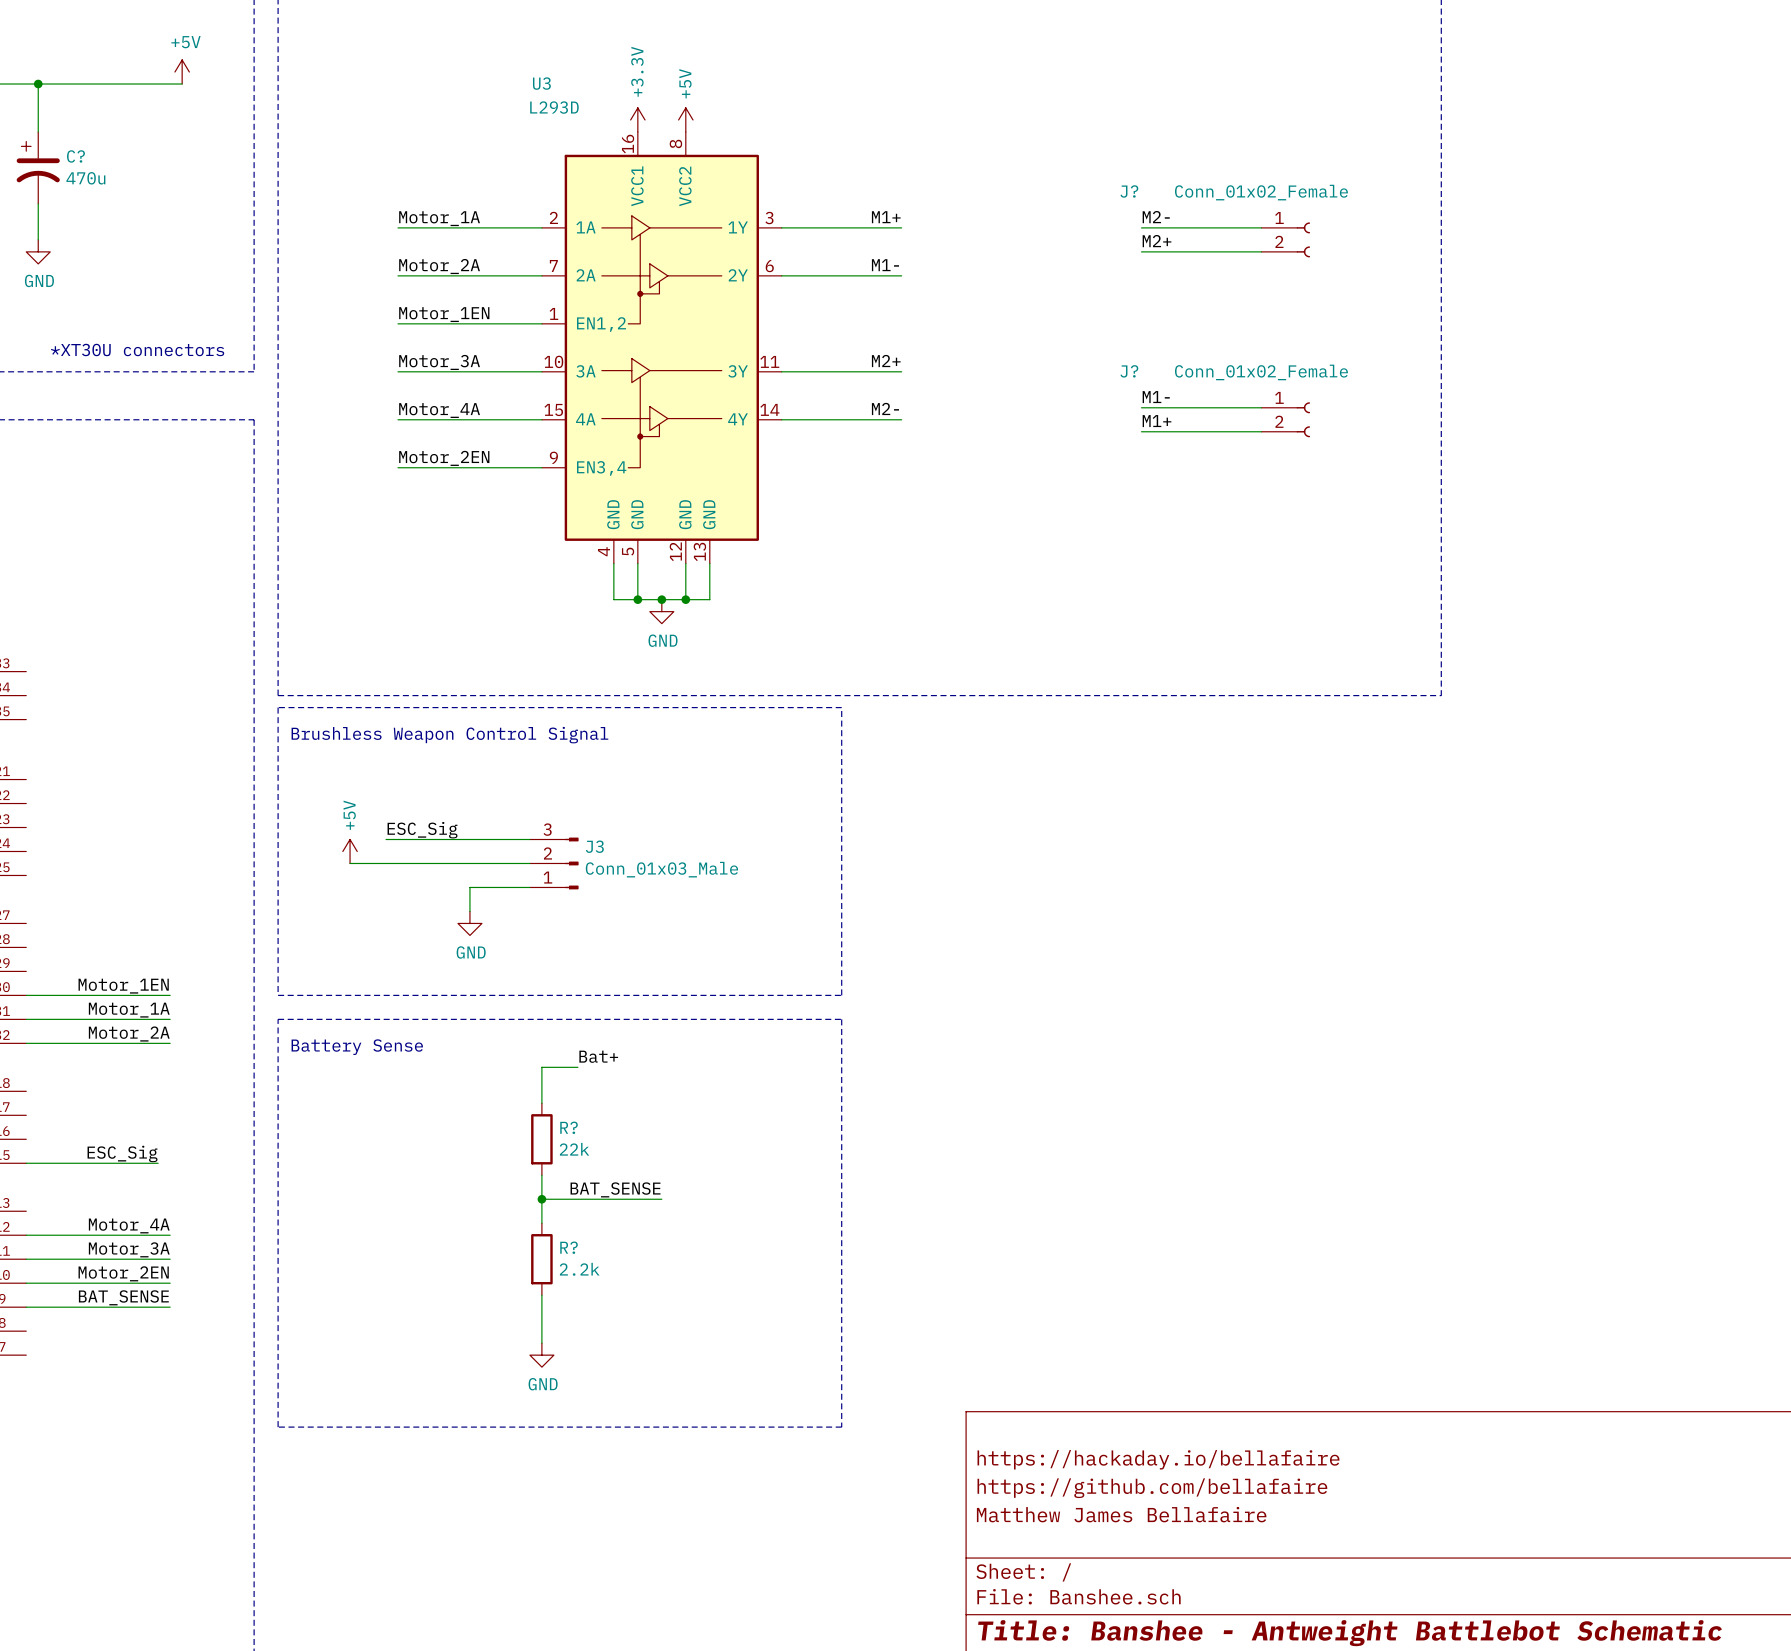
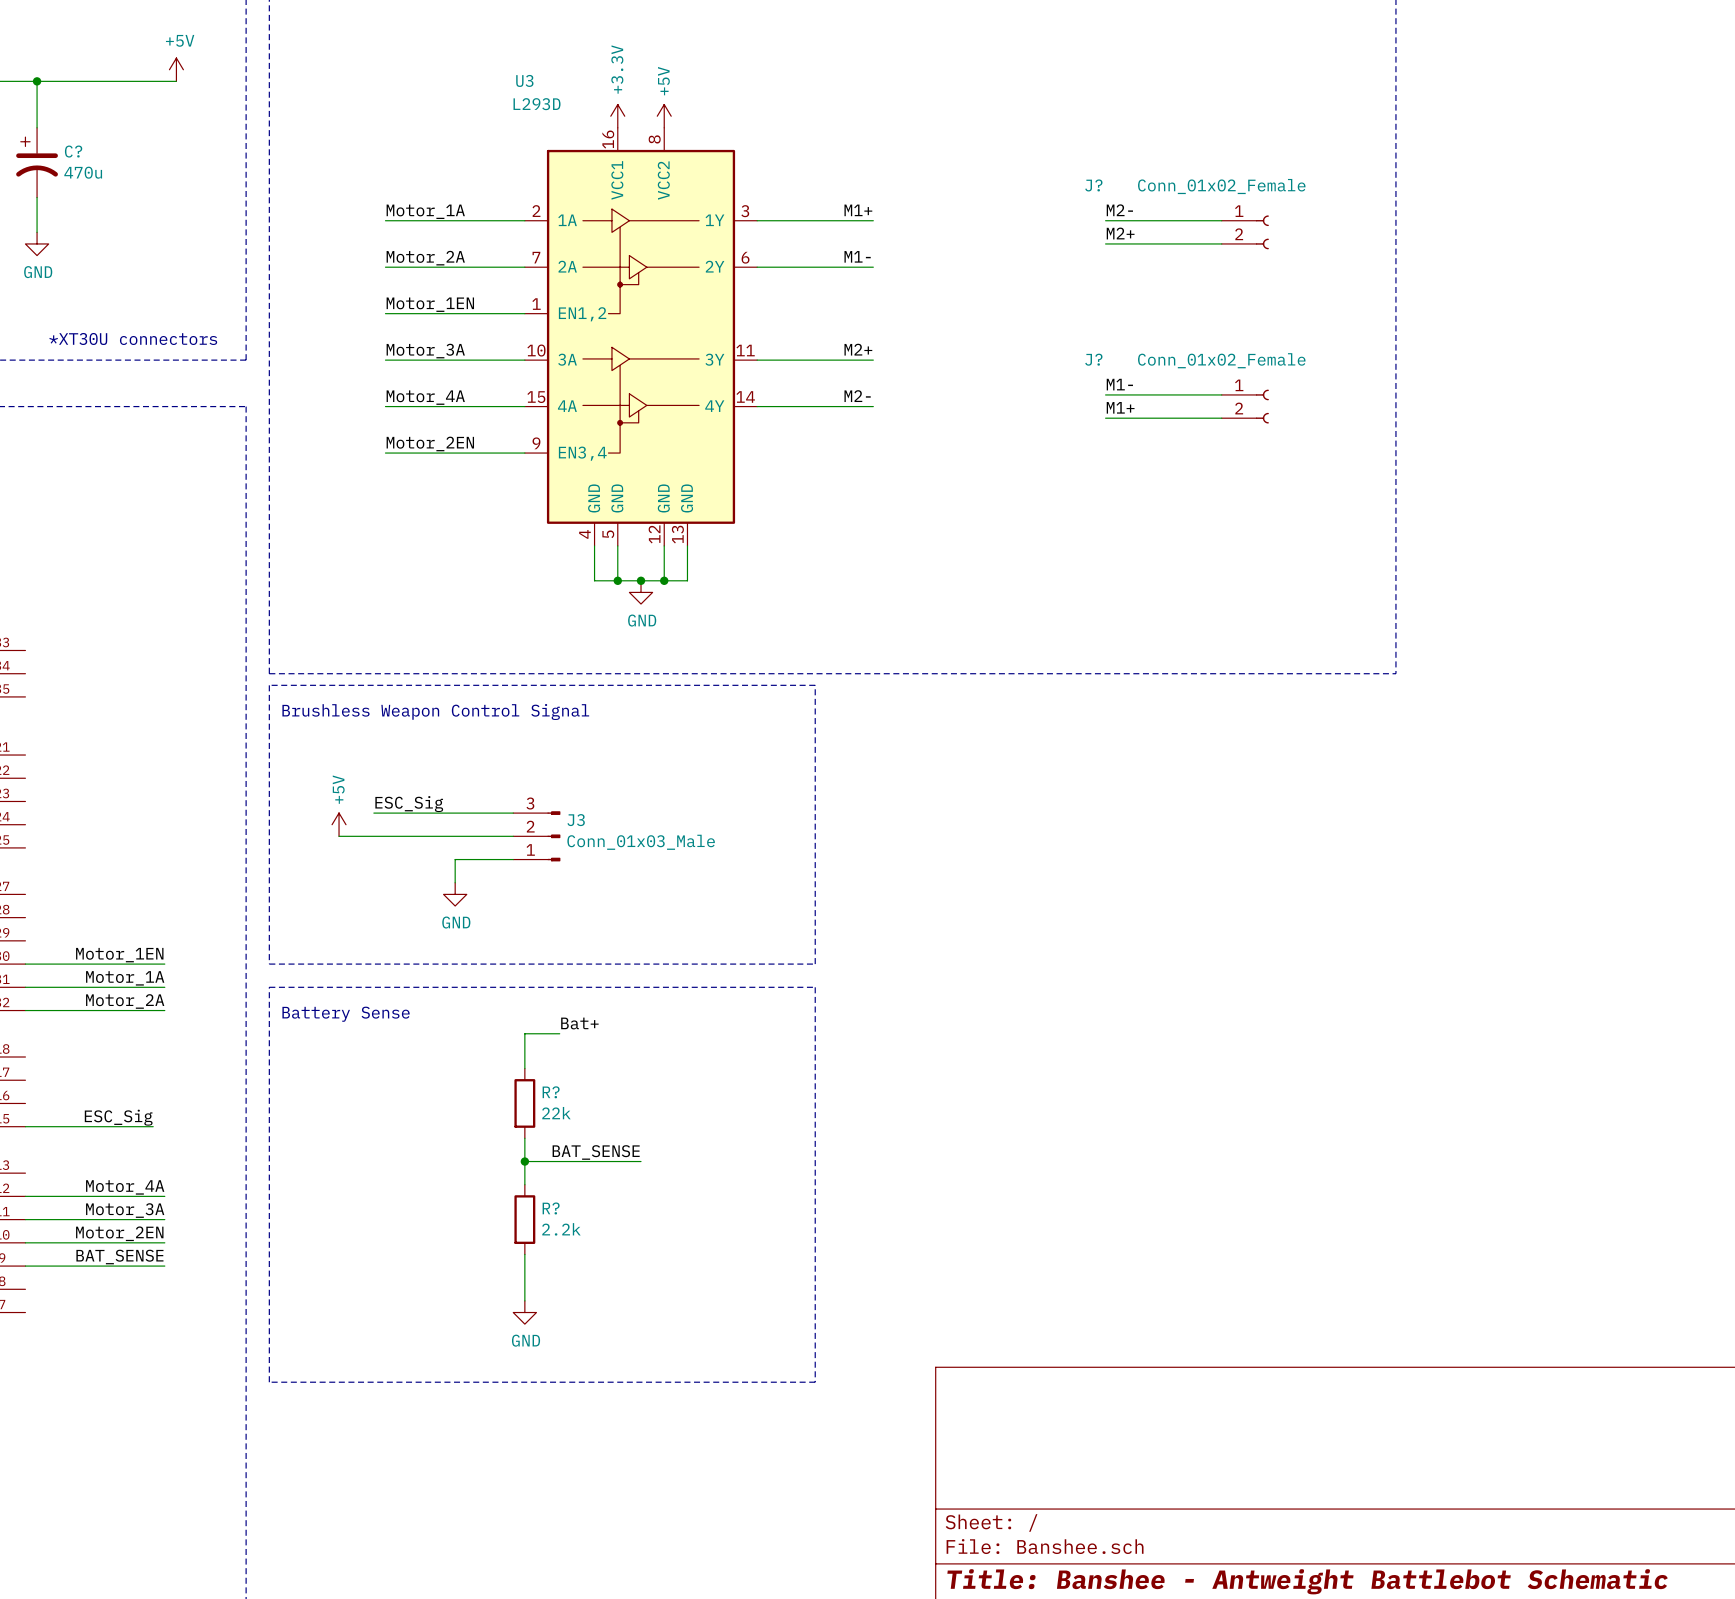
title block: https://hackaday.io/bellafaire (1158, 1459) -> none
title block: https://github.com/bellafaire (1152, 1488) -> none
title block: Matthew James Bellafaire (1121, 1514) -> none

